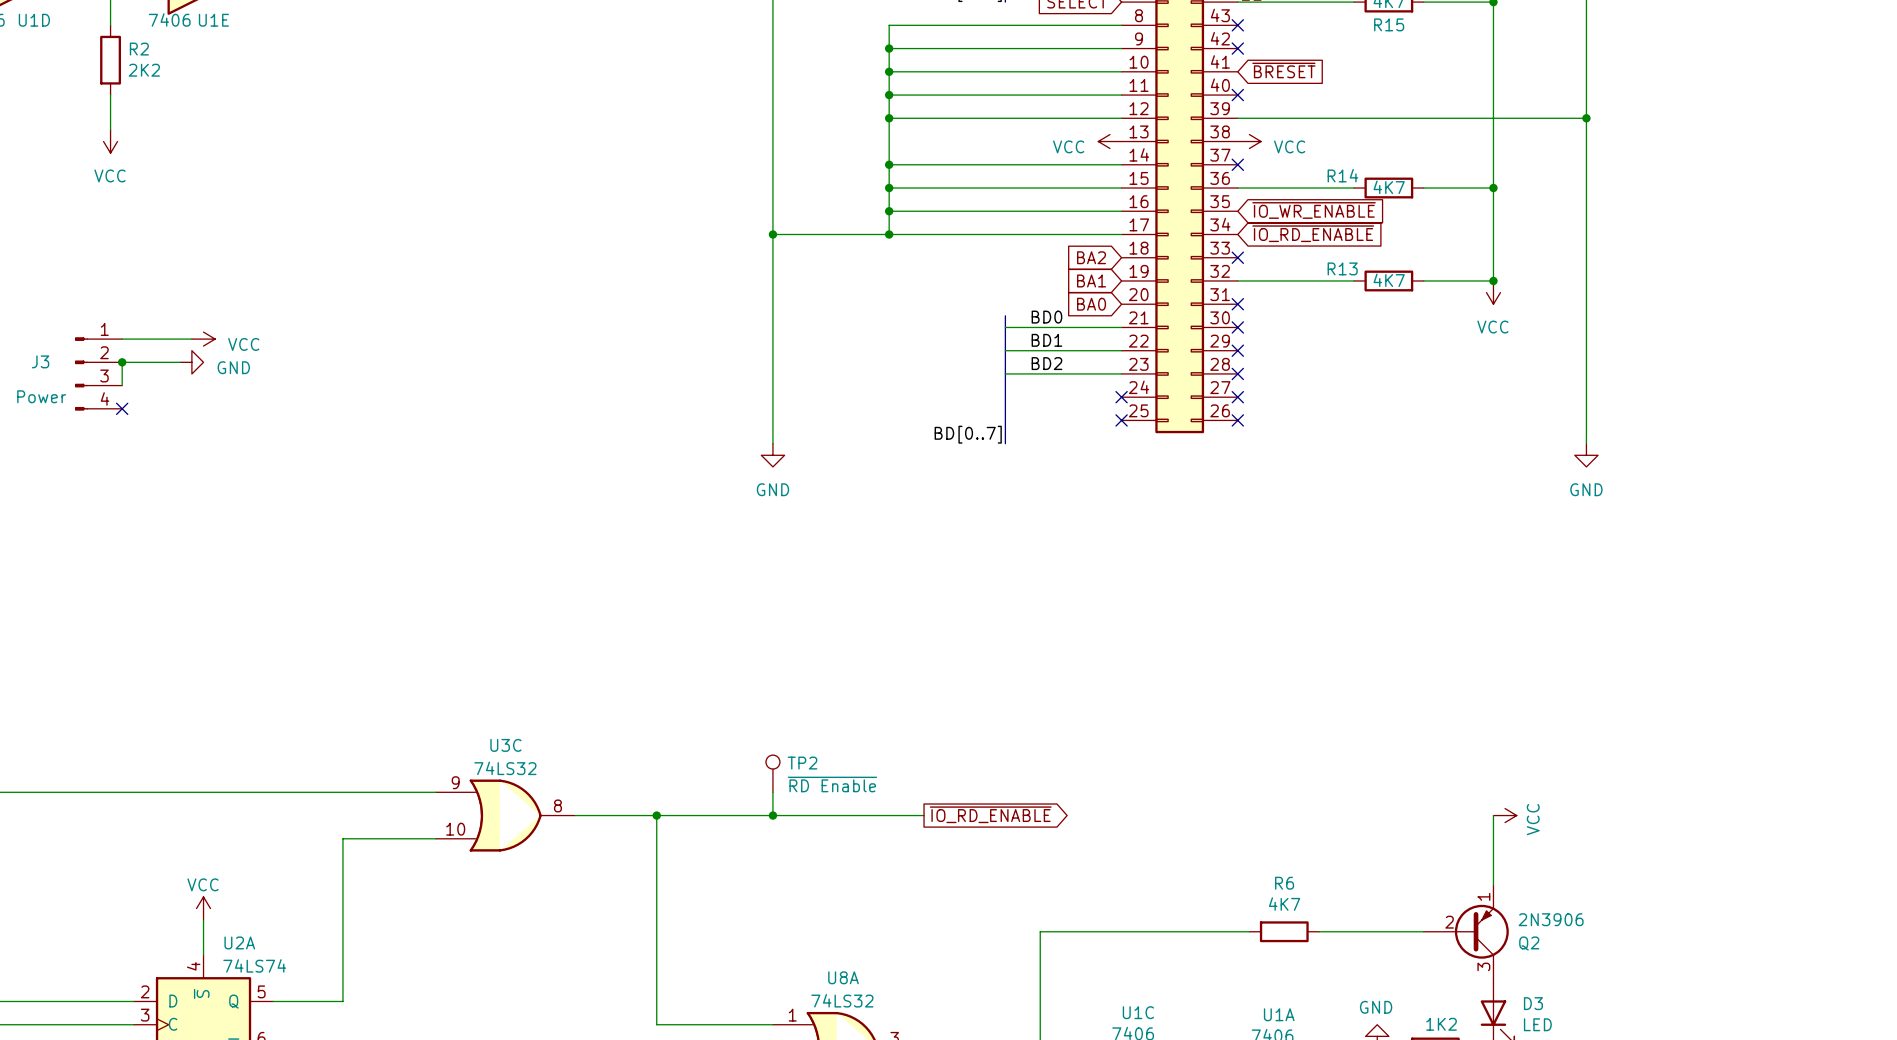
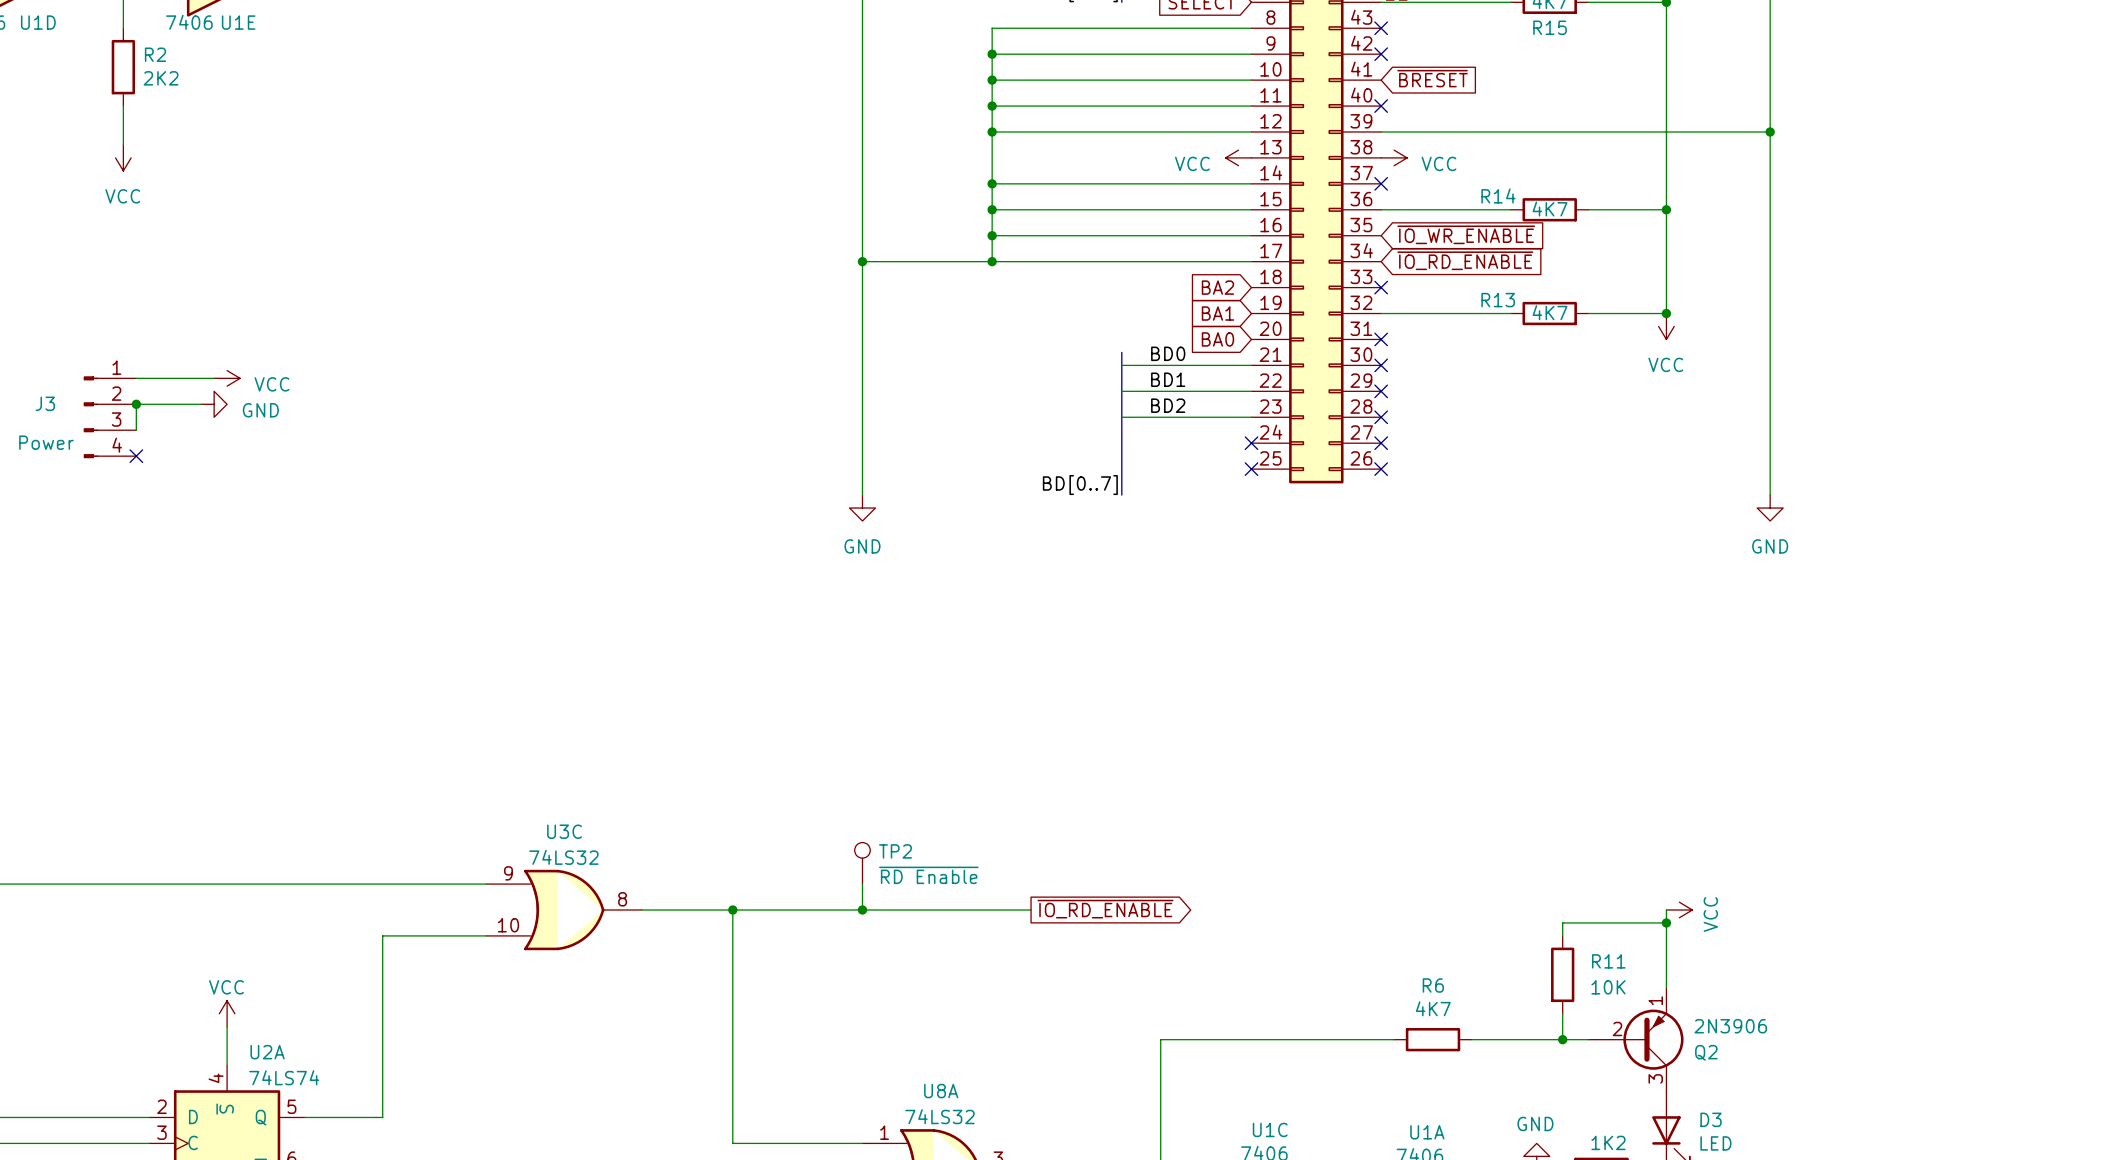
wire: none -> (1666, 922) (1562, 922) (1562, 935)
junction: none -> (1666, 922)
R11: none -> 10K (1562, 974)
wire: none -> (1562, 1013) (1562, 1039)
junction: none -> (1562, 1039)

